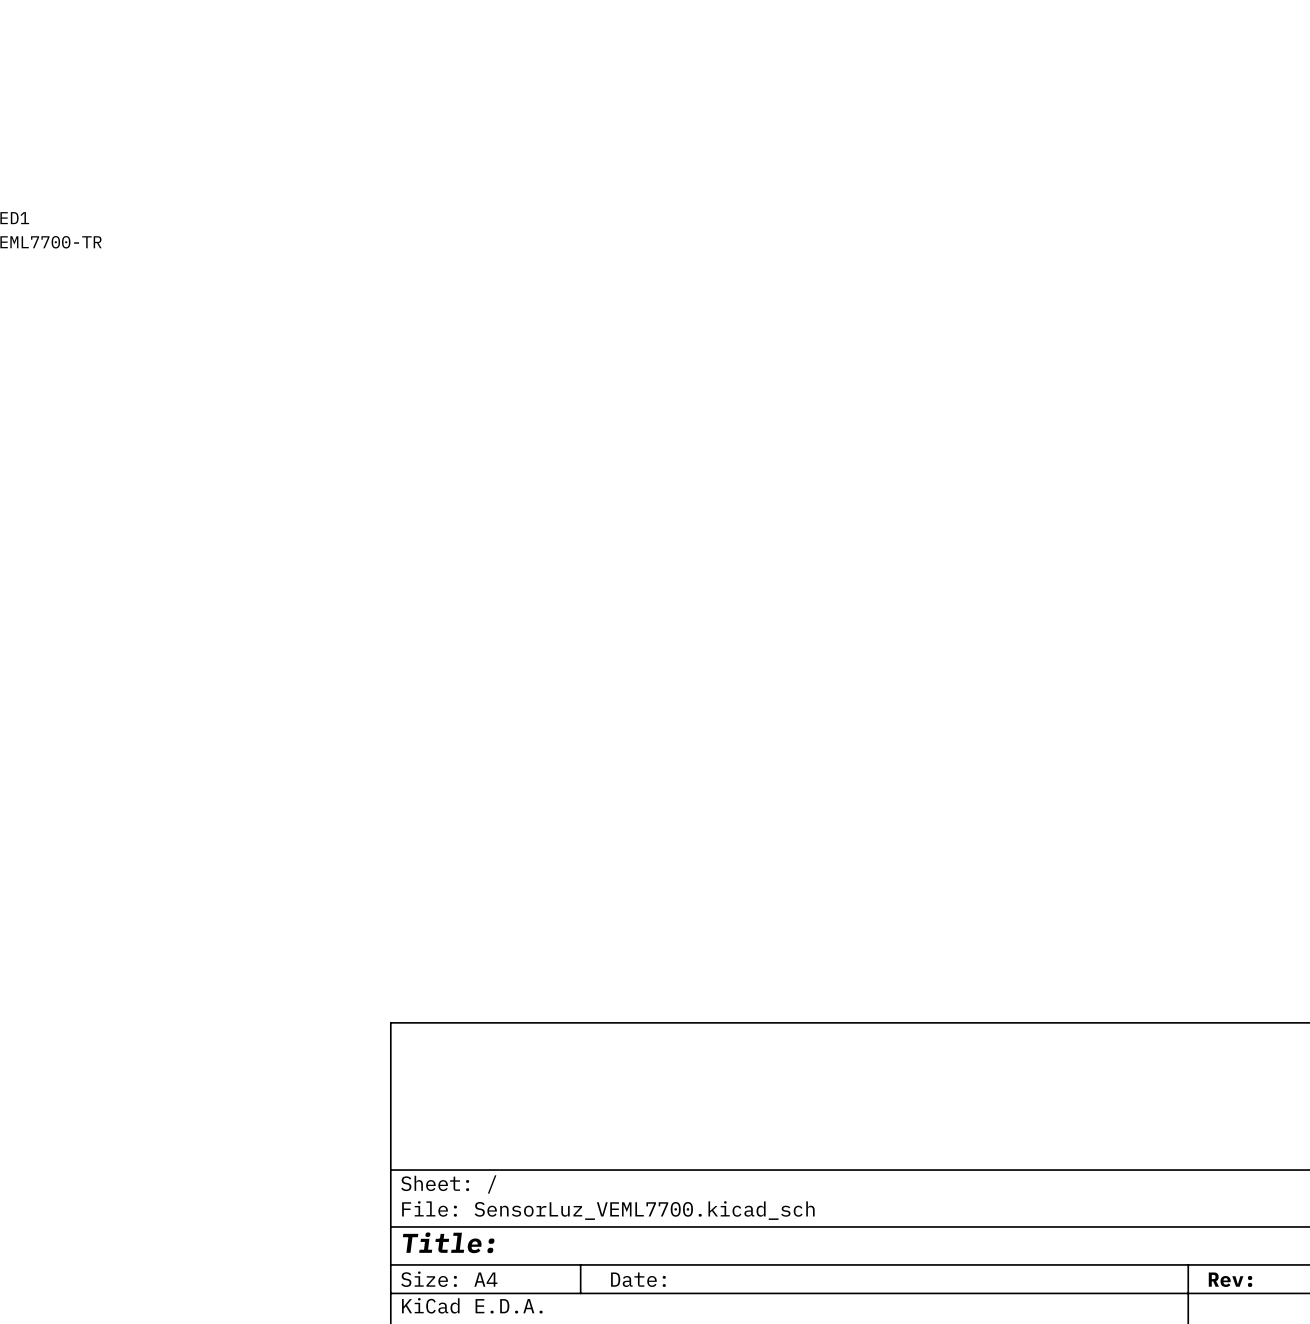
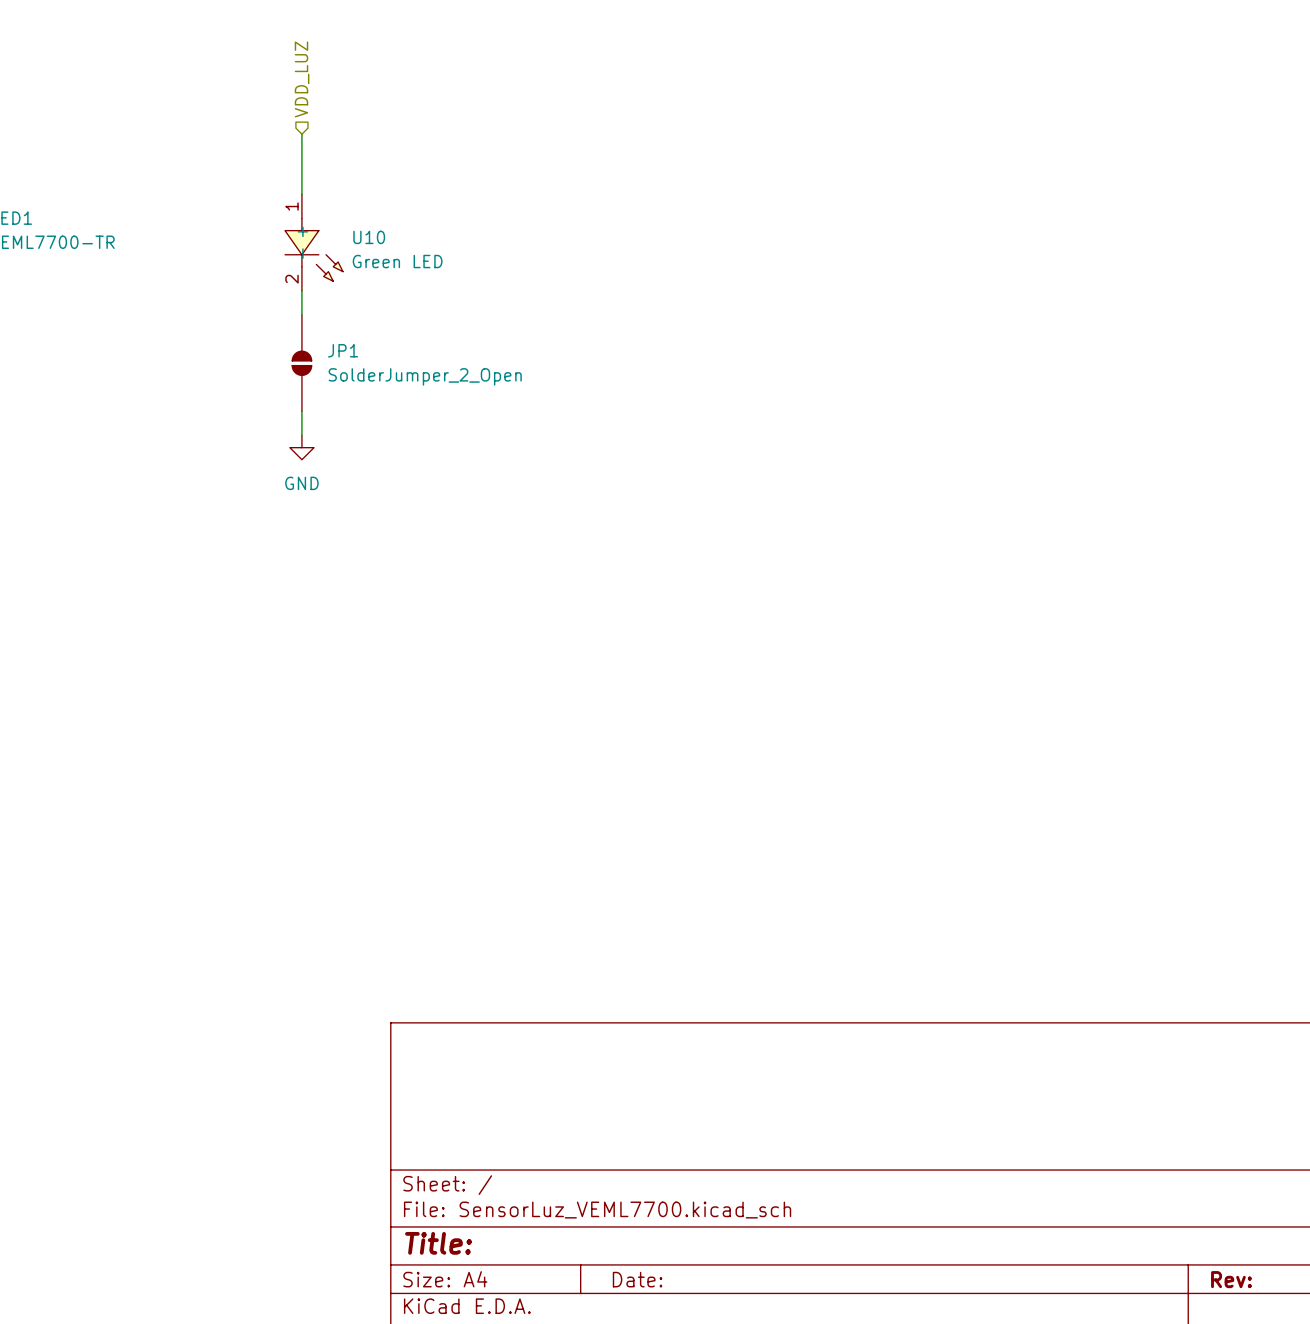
hierarchical label: none -> VDD_LUZ (302, 79)
wire: none -> (301, 134) (301, 194)
U10: none -> Green LED (314, 242)
wire: none -> (301, 290) (301, 315)
JP1: none -> SolderJumper_2_Open (301, 363)
wire: none -> (301, 411) (301, 435)
power symbol: none -> GND (301, 447)

